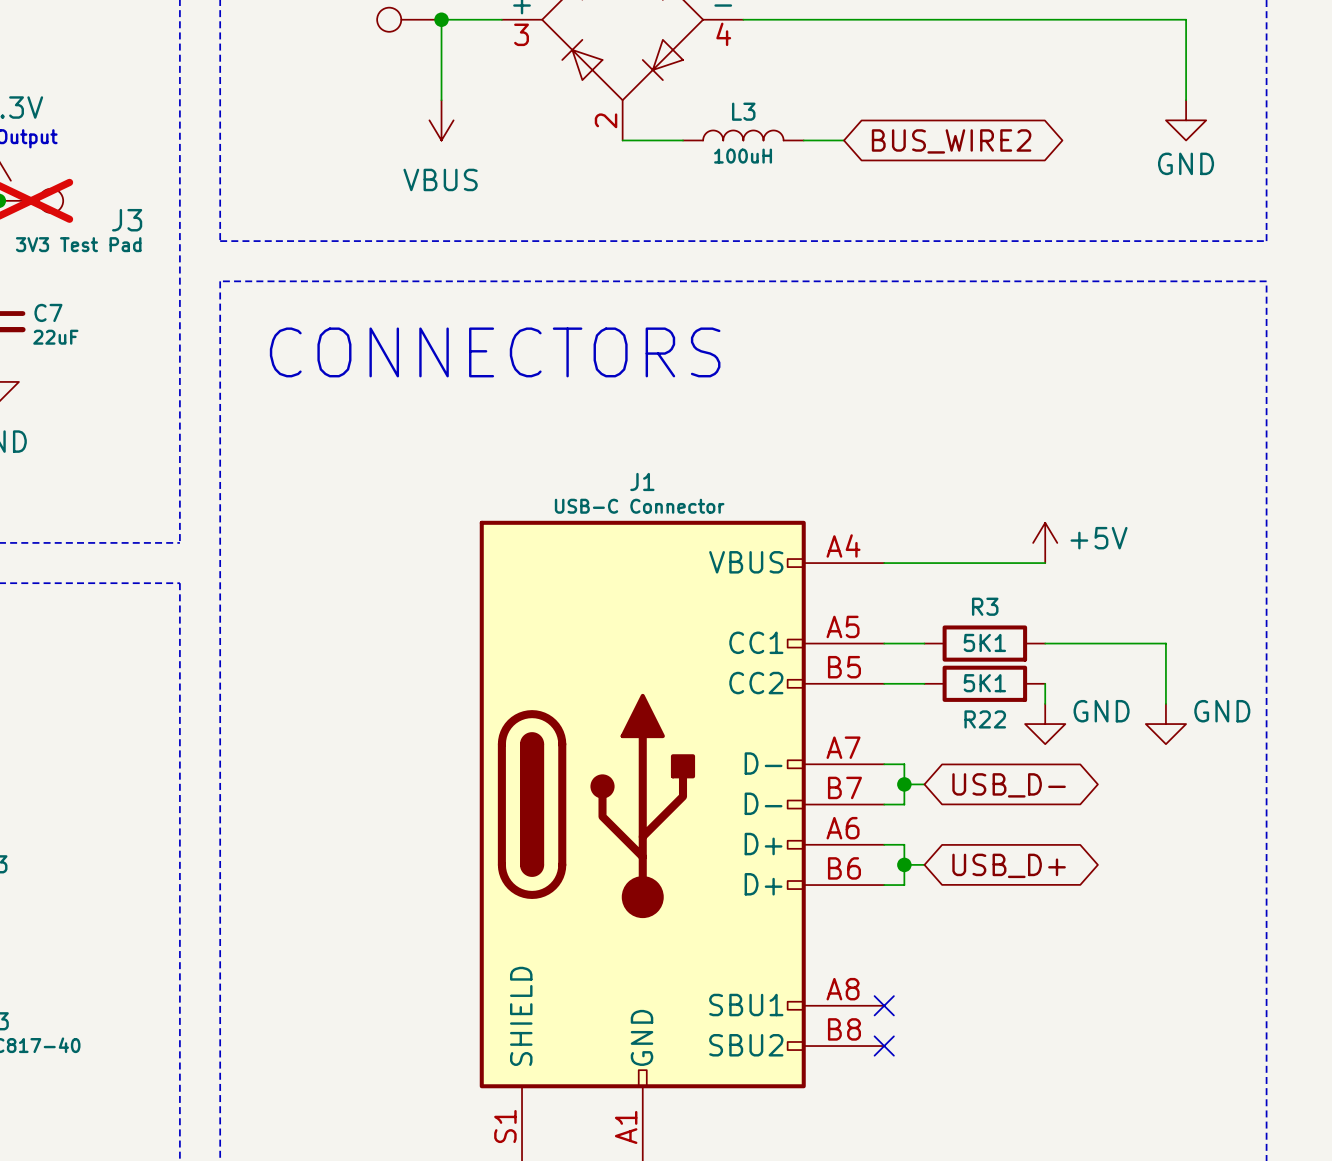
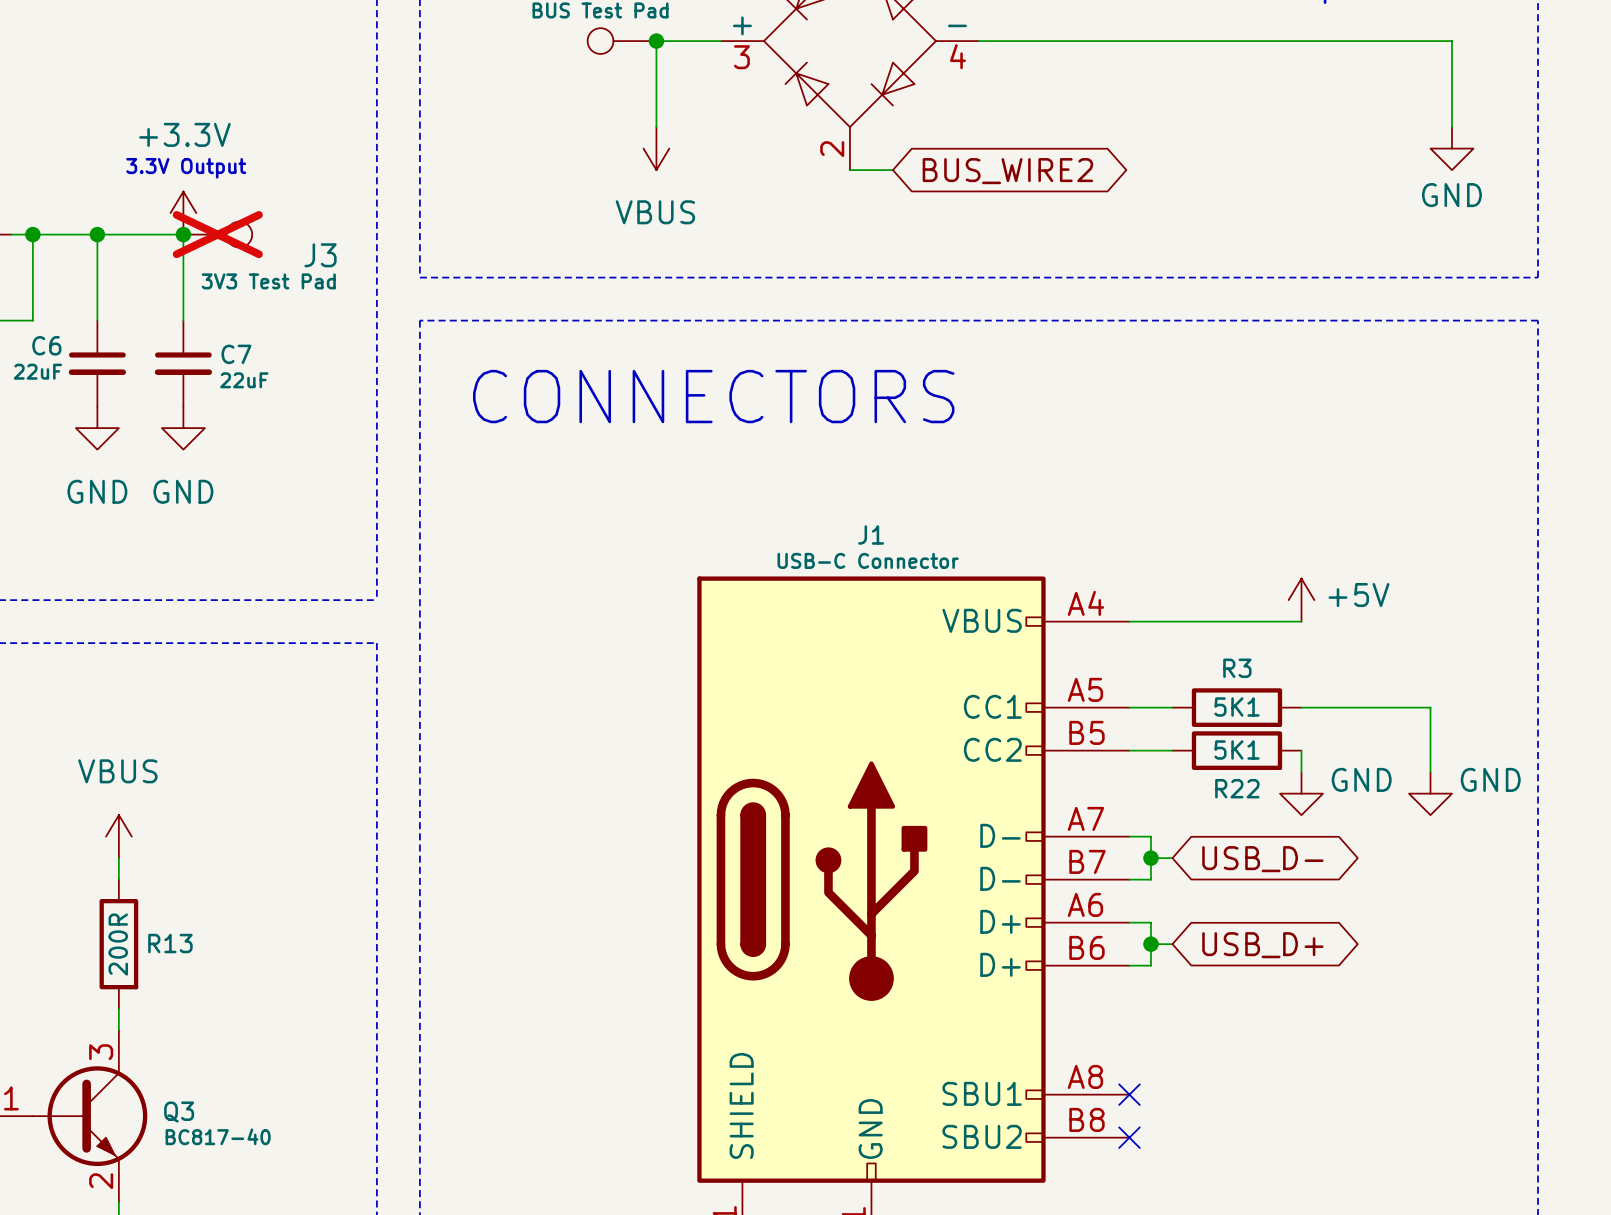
L3: 100uH (743, 135) -> none
wire: (662, 140) (683, 140) -> none
wire: (803, 140) (843, 140) -> none
global label position: BUS_WIRE2 (951, 141) -> BUS_WIRE2 (1007, 171)

